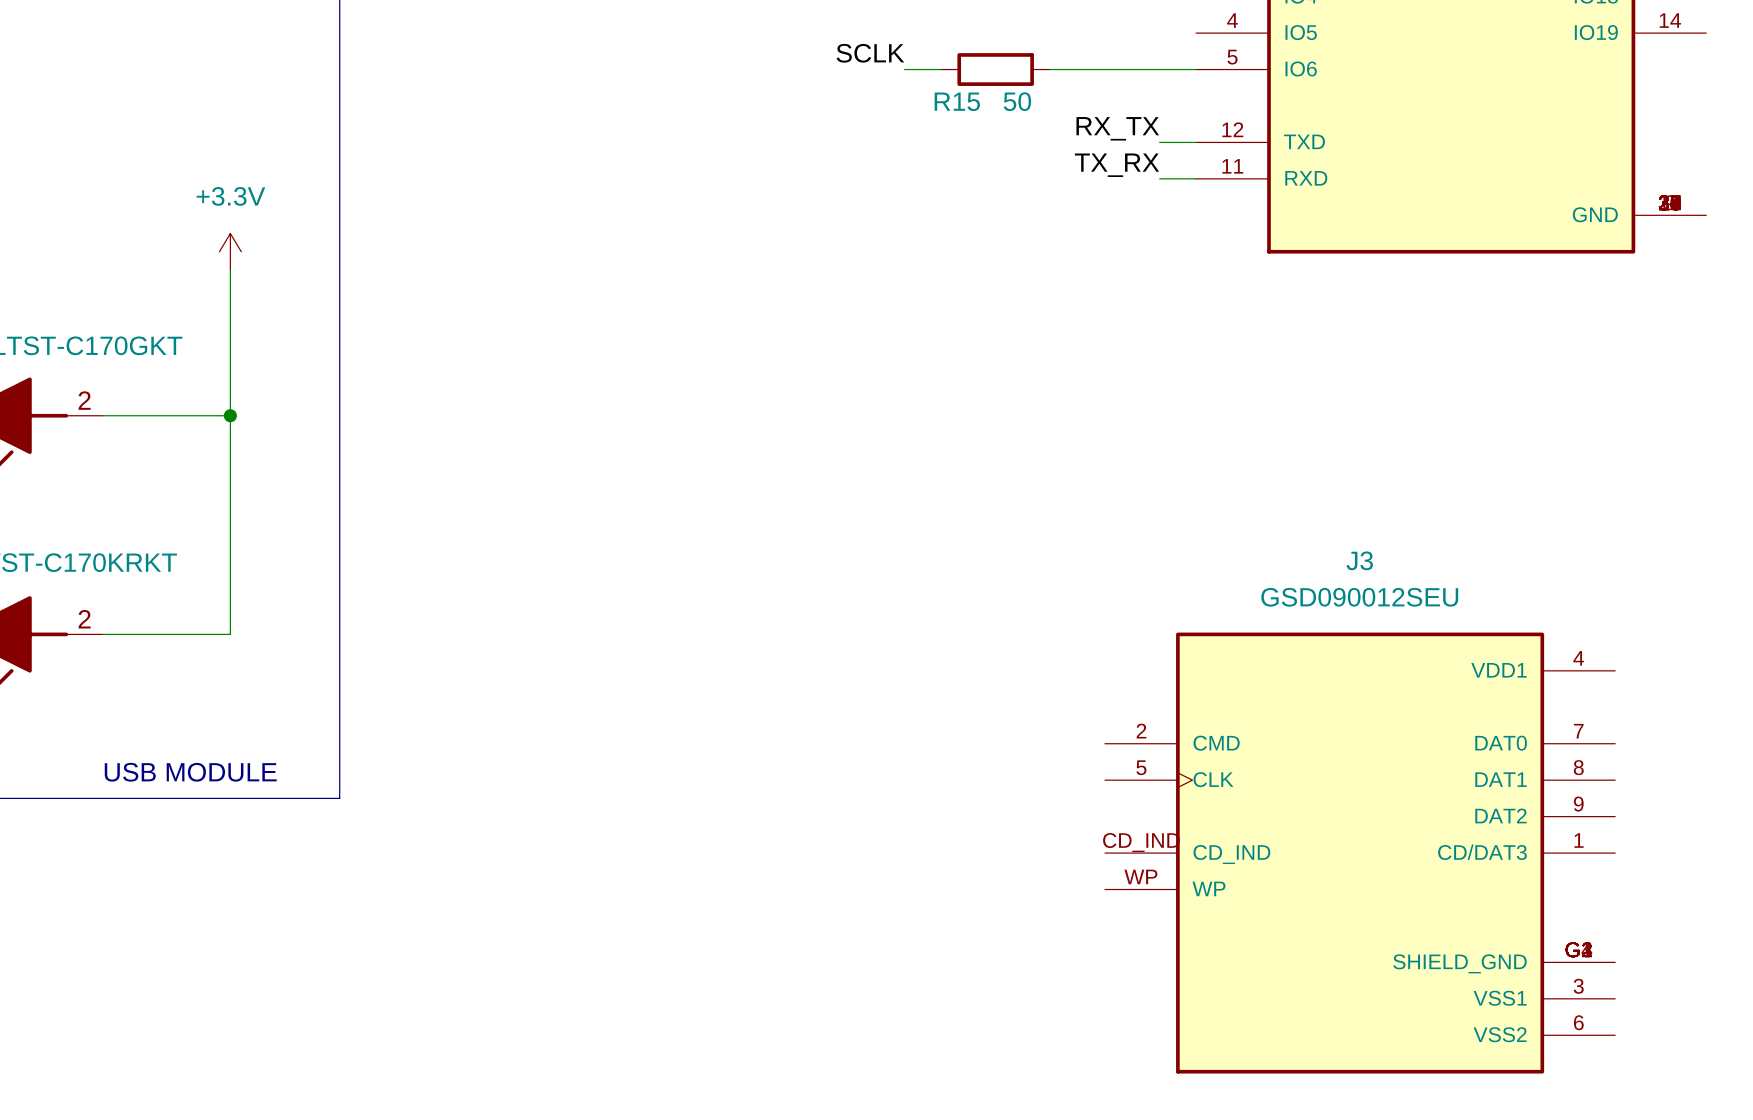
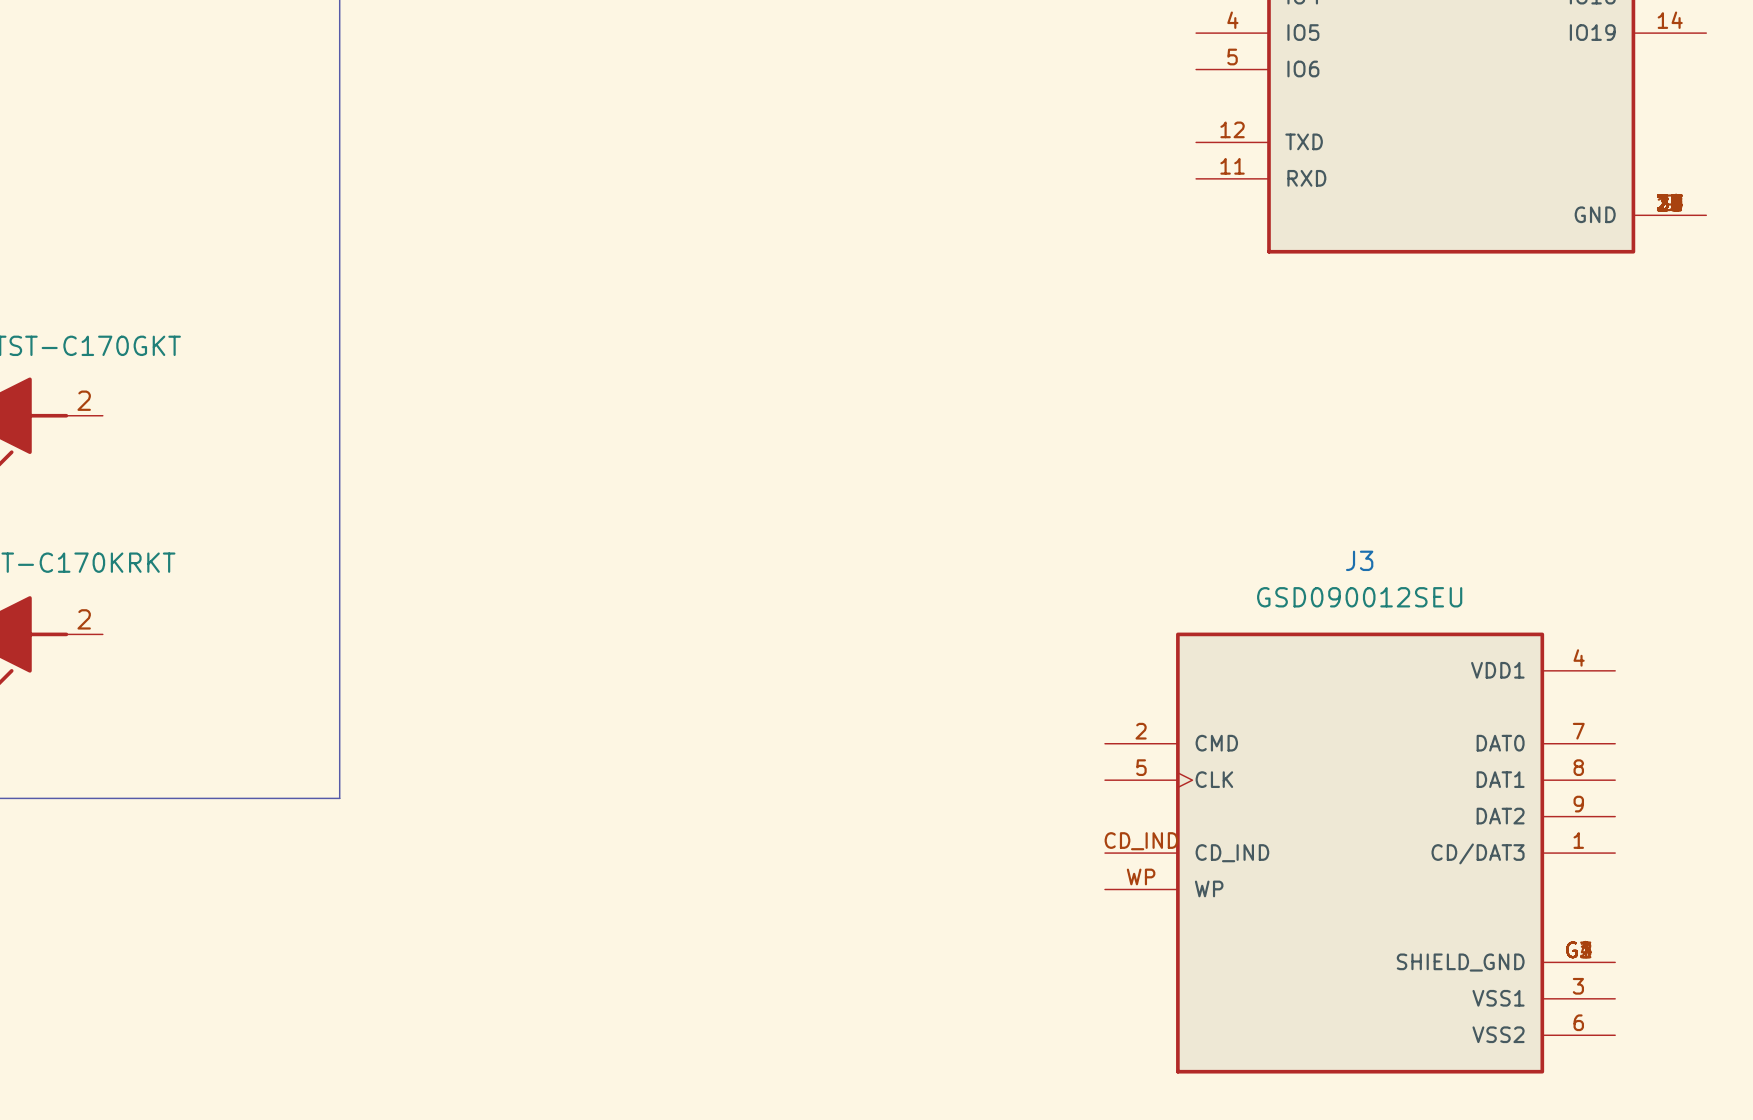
label: SCLK (870, 53) -> none
wire: (904, 69) (941, 69) -> none
R15: 50 (995, 69) -> none
wire: (1050, 69) (1196, 69) -> none
label: RX_TX (1117, 128) -> none
wire: (1159, 142) (1196, 142) -> none
label: TX_RX (1116, 165) -> none
wire: (1159, 178) (1196, 178) -> none
power symbol: +3.3V (230, 251) -> none
wire: (230, 269) (230, 634) (102, 634) -> none
wire: (102, 415) (230, 415) -> none
junction: (230, 415) -> none
text: USB MODULE (190, 772) -> none

